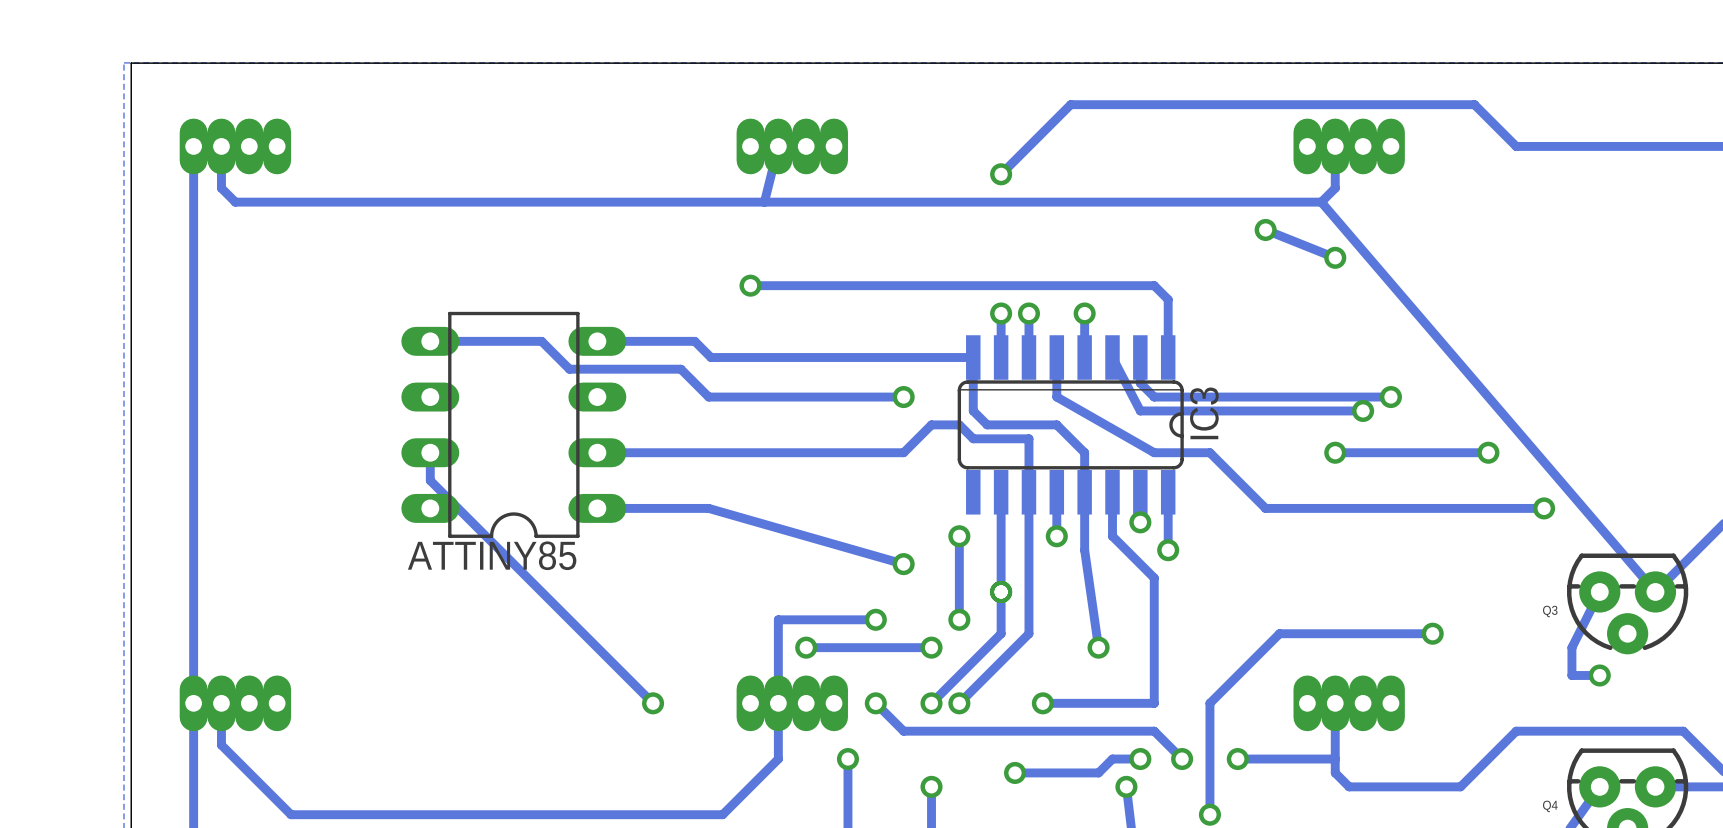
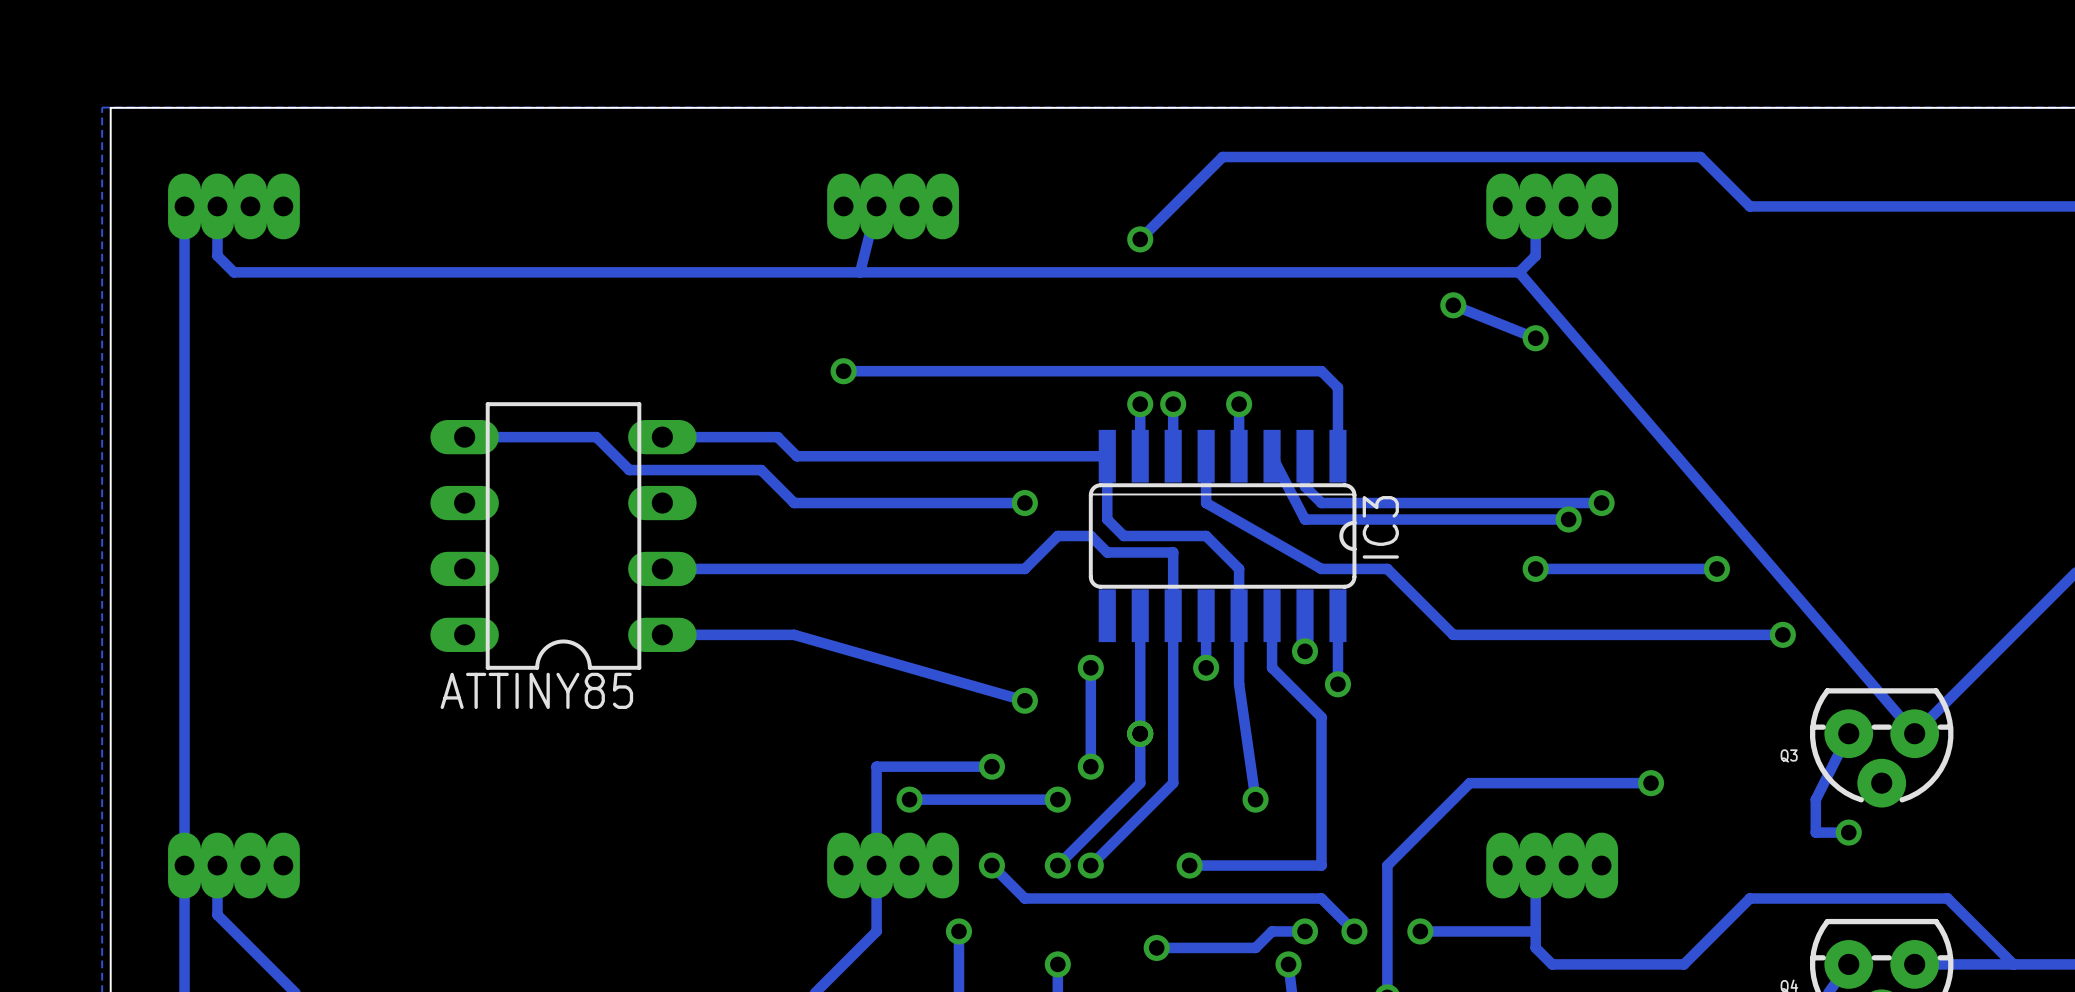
track: (430, 452) (430, 480) (653, 703) -> none
via: (653, 703) -> none

